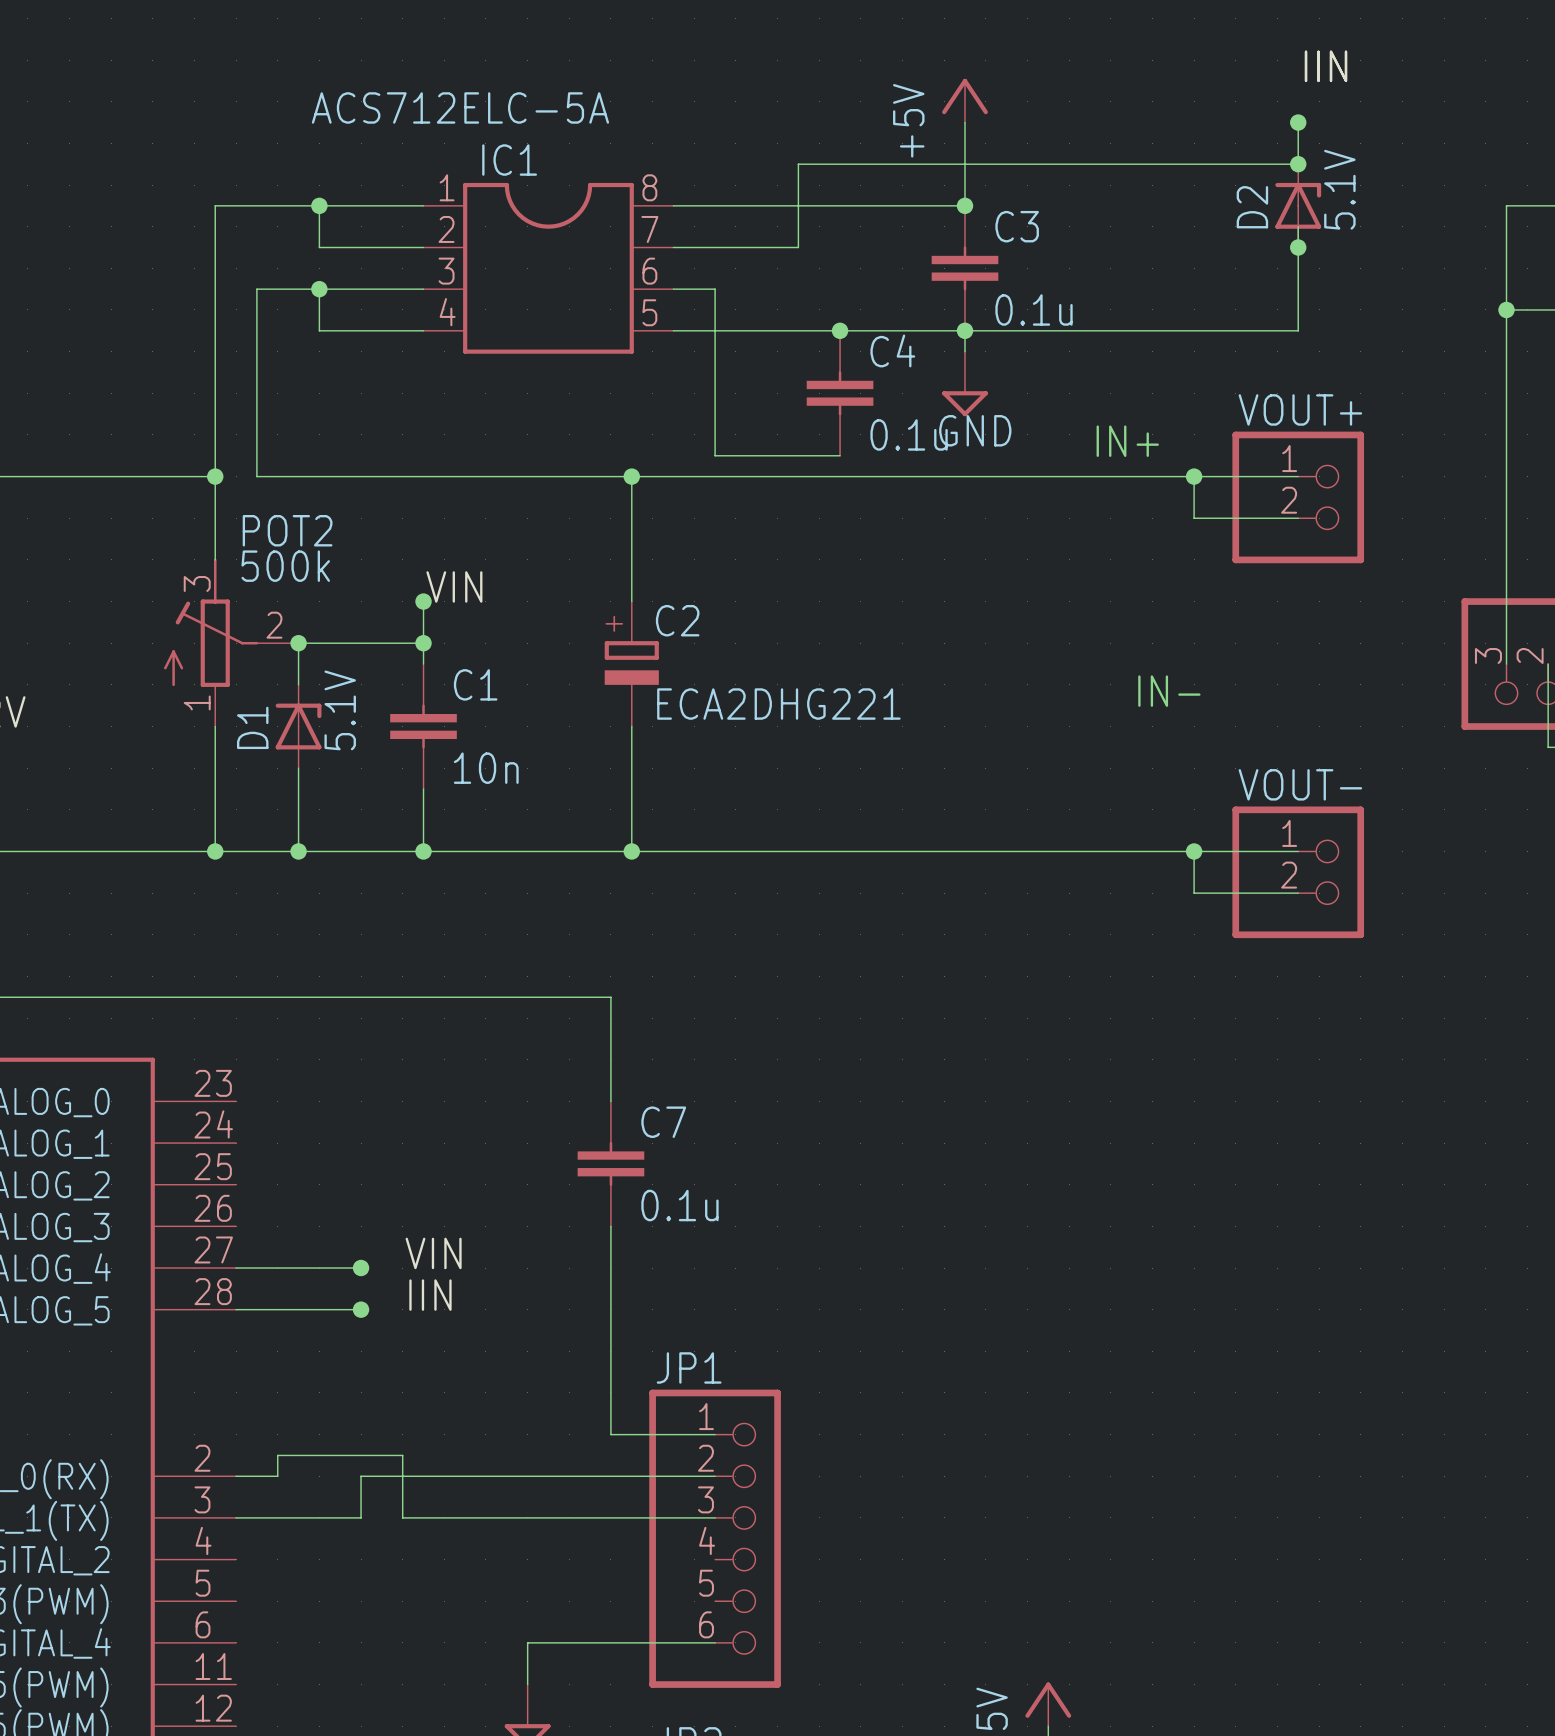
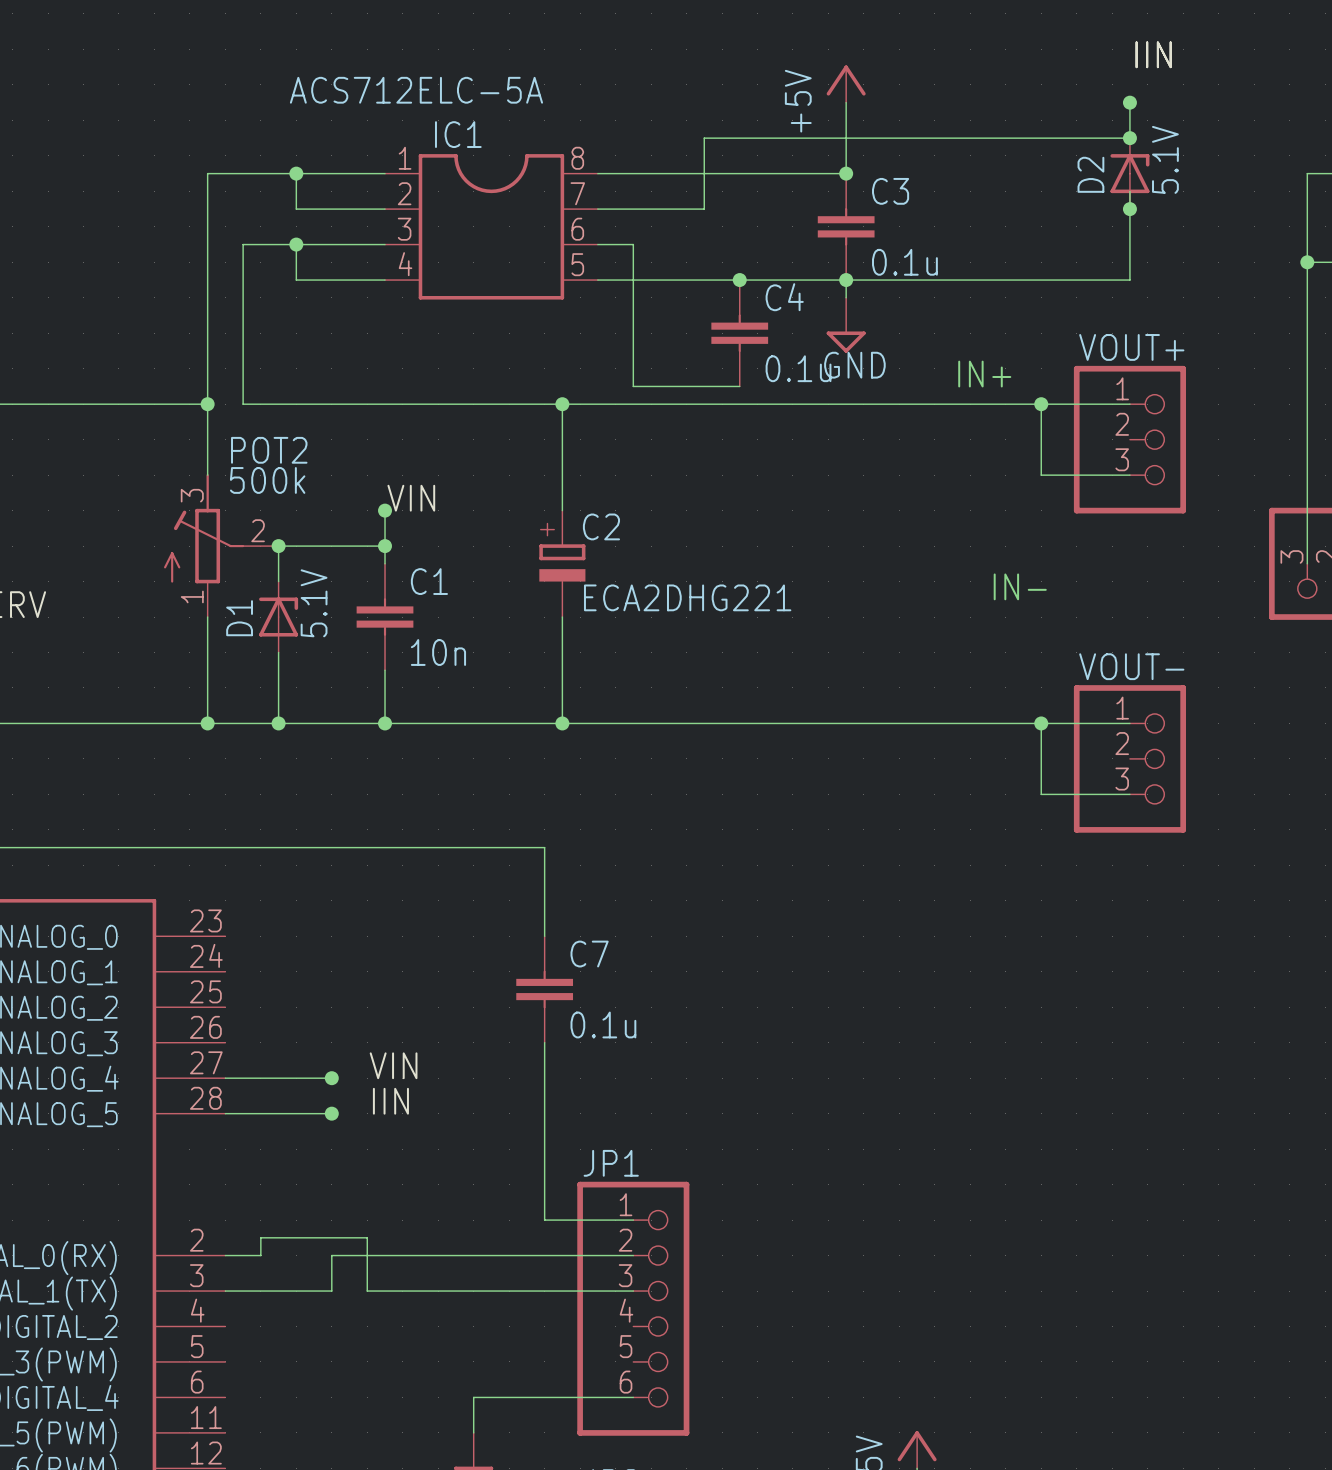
VOUT+: (1298, 497) -> none
wire: (1194, 518) (1298, 518) -> (1041, 439) (1041, 475) (1129, 475)
VOUT+: none -> (1129, 439)
VOUT-: (1298, 872) -> none
wire: (1194, 893) (1298, 893) -> (1041, 758) (1041, 794) (1129, 794)
VOUT-: none -> (1129, 758)

